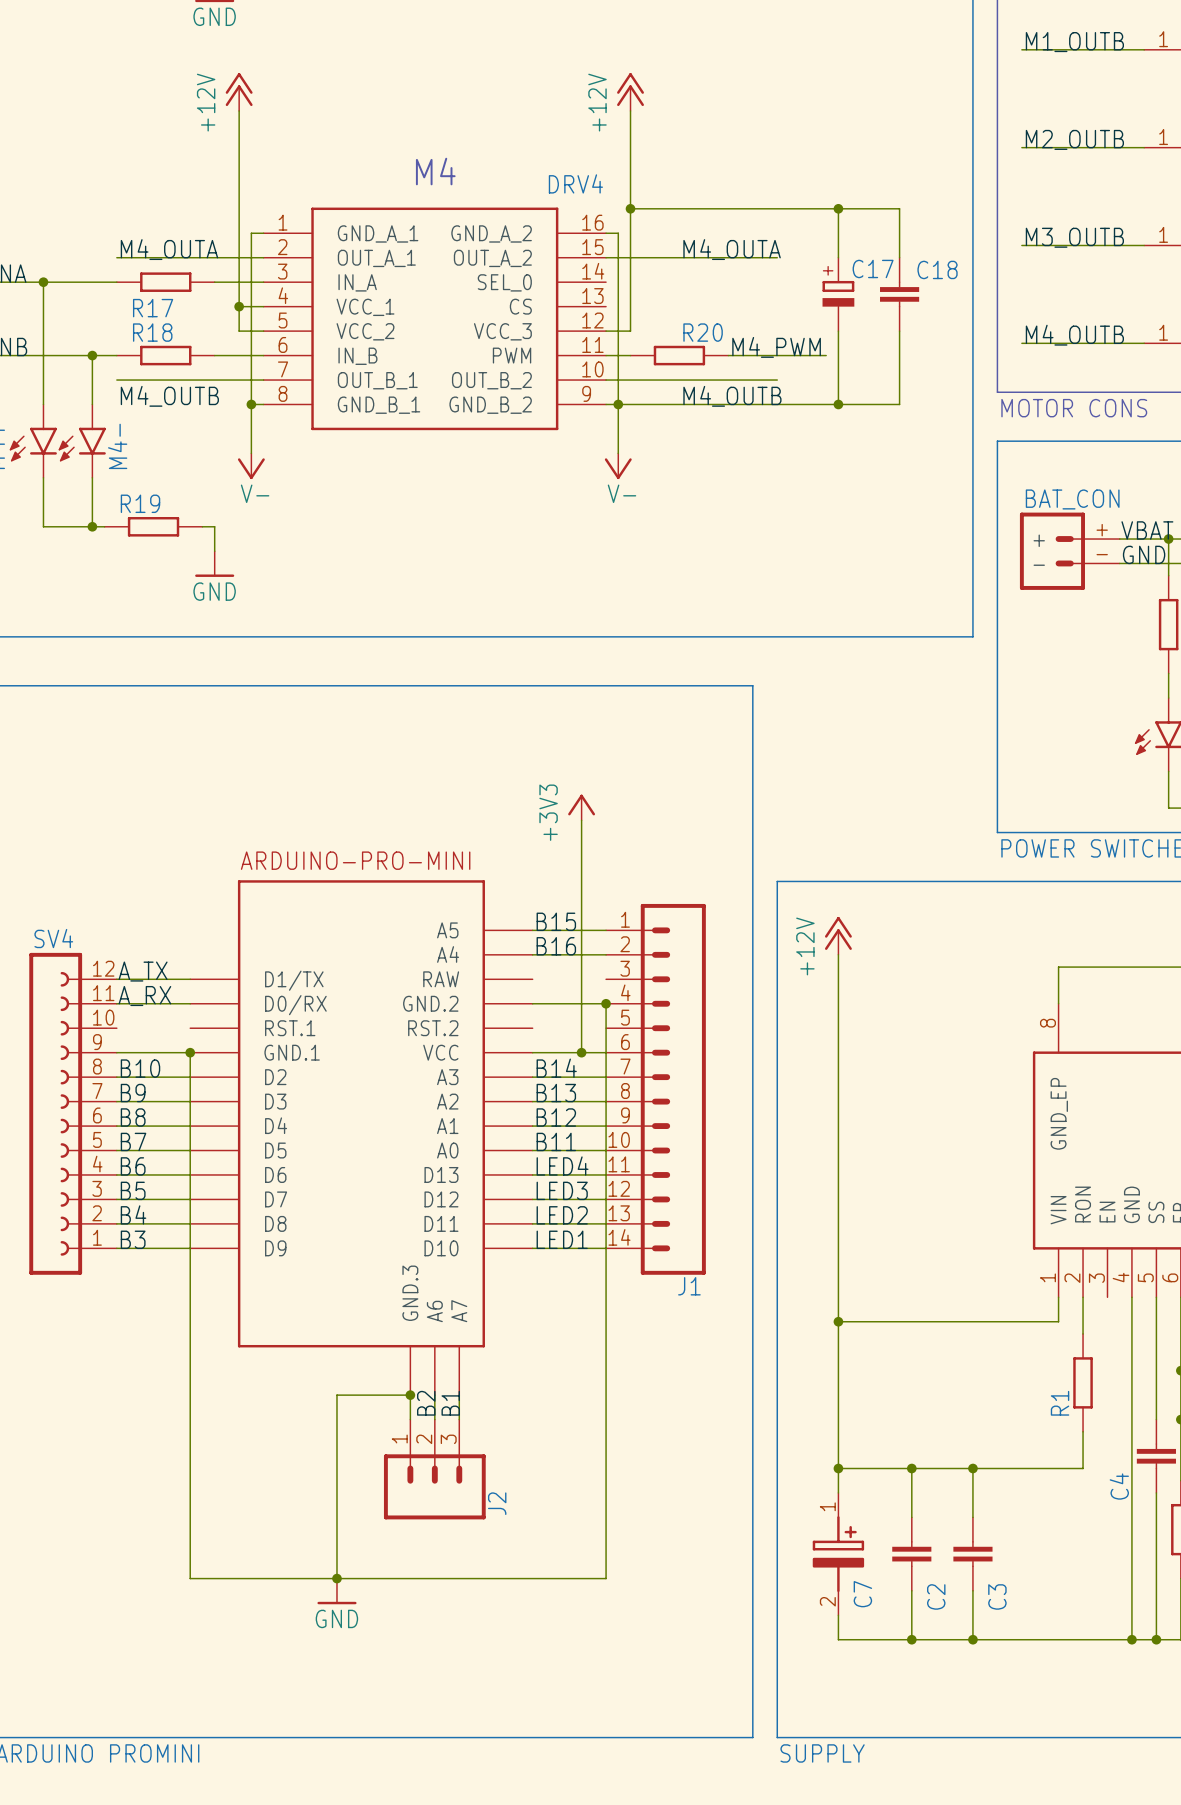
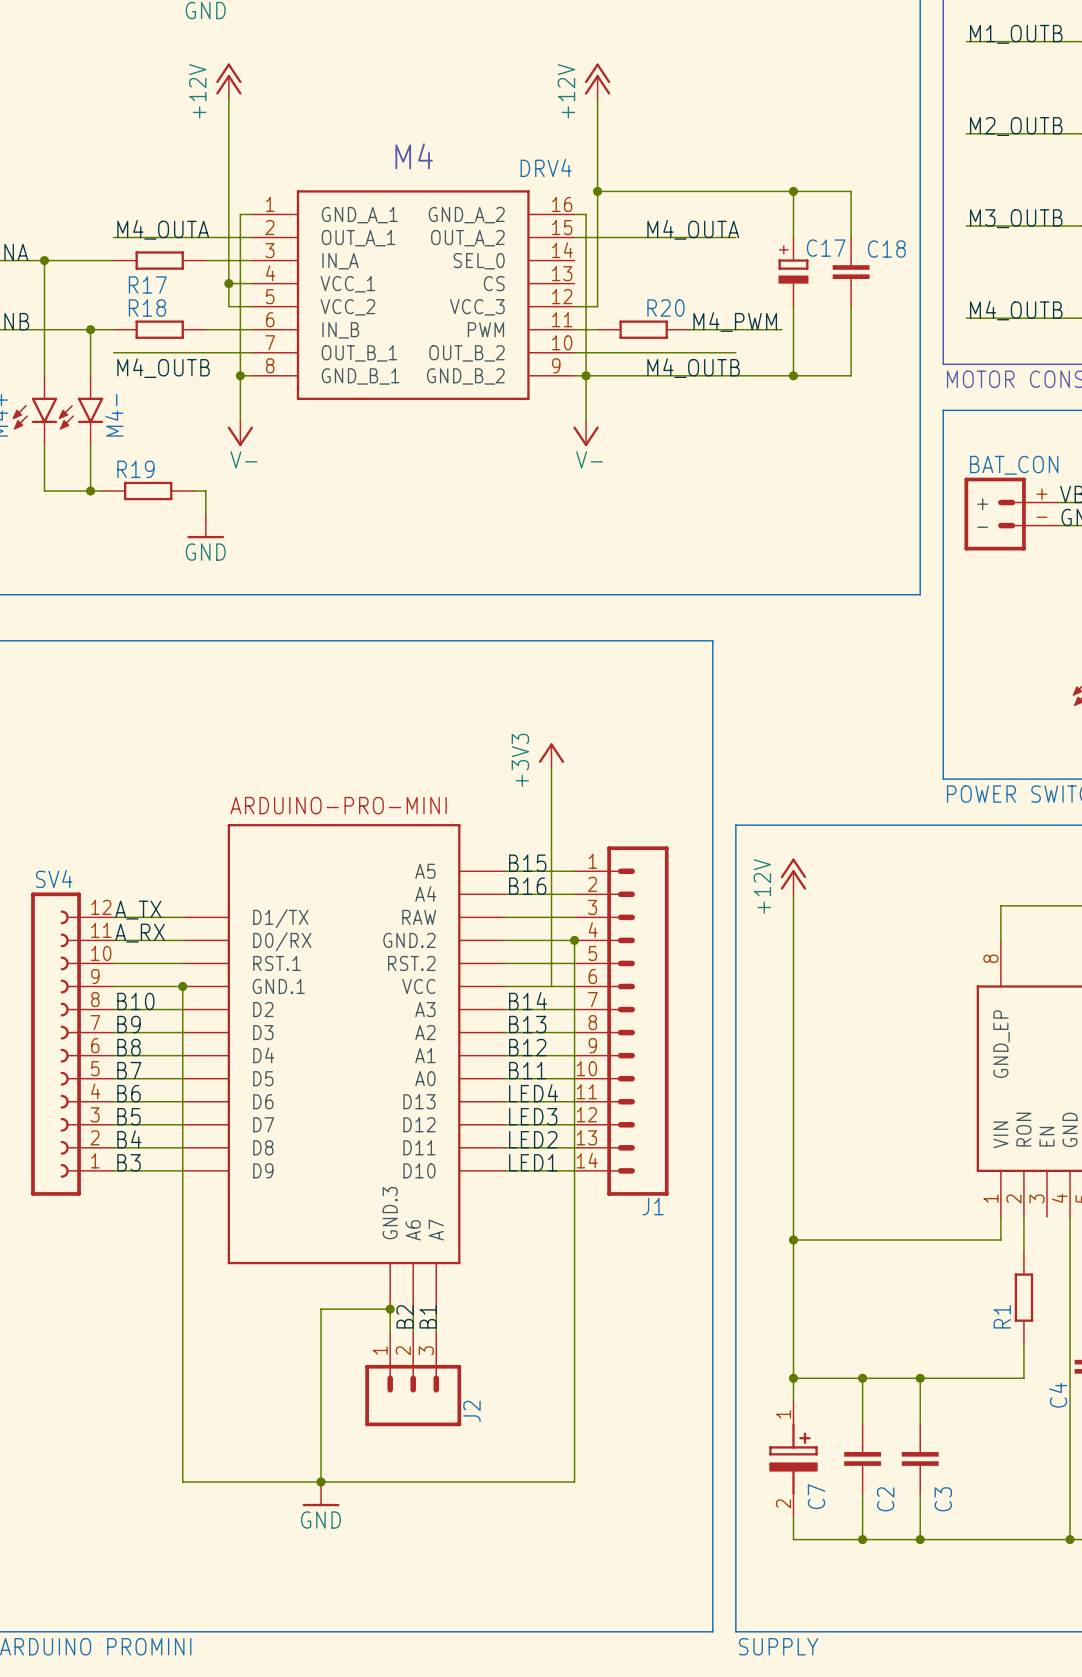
wire: none -> (505, 917) (574, 917)
wire: none -> (113, 963) (182, 963)
wire: none -> (505, 963) (574, 963)
junction: (581, 1052) -> none

